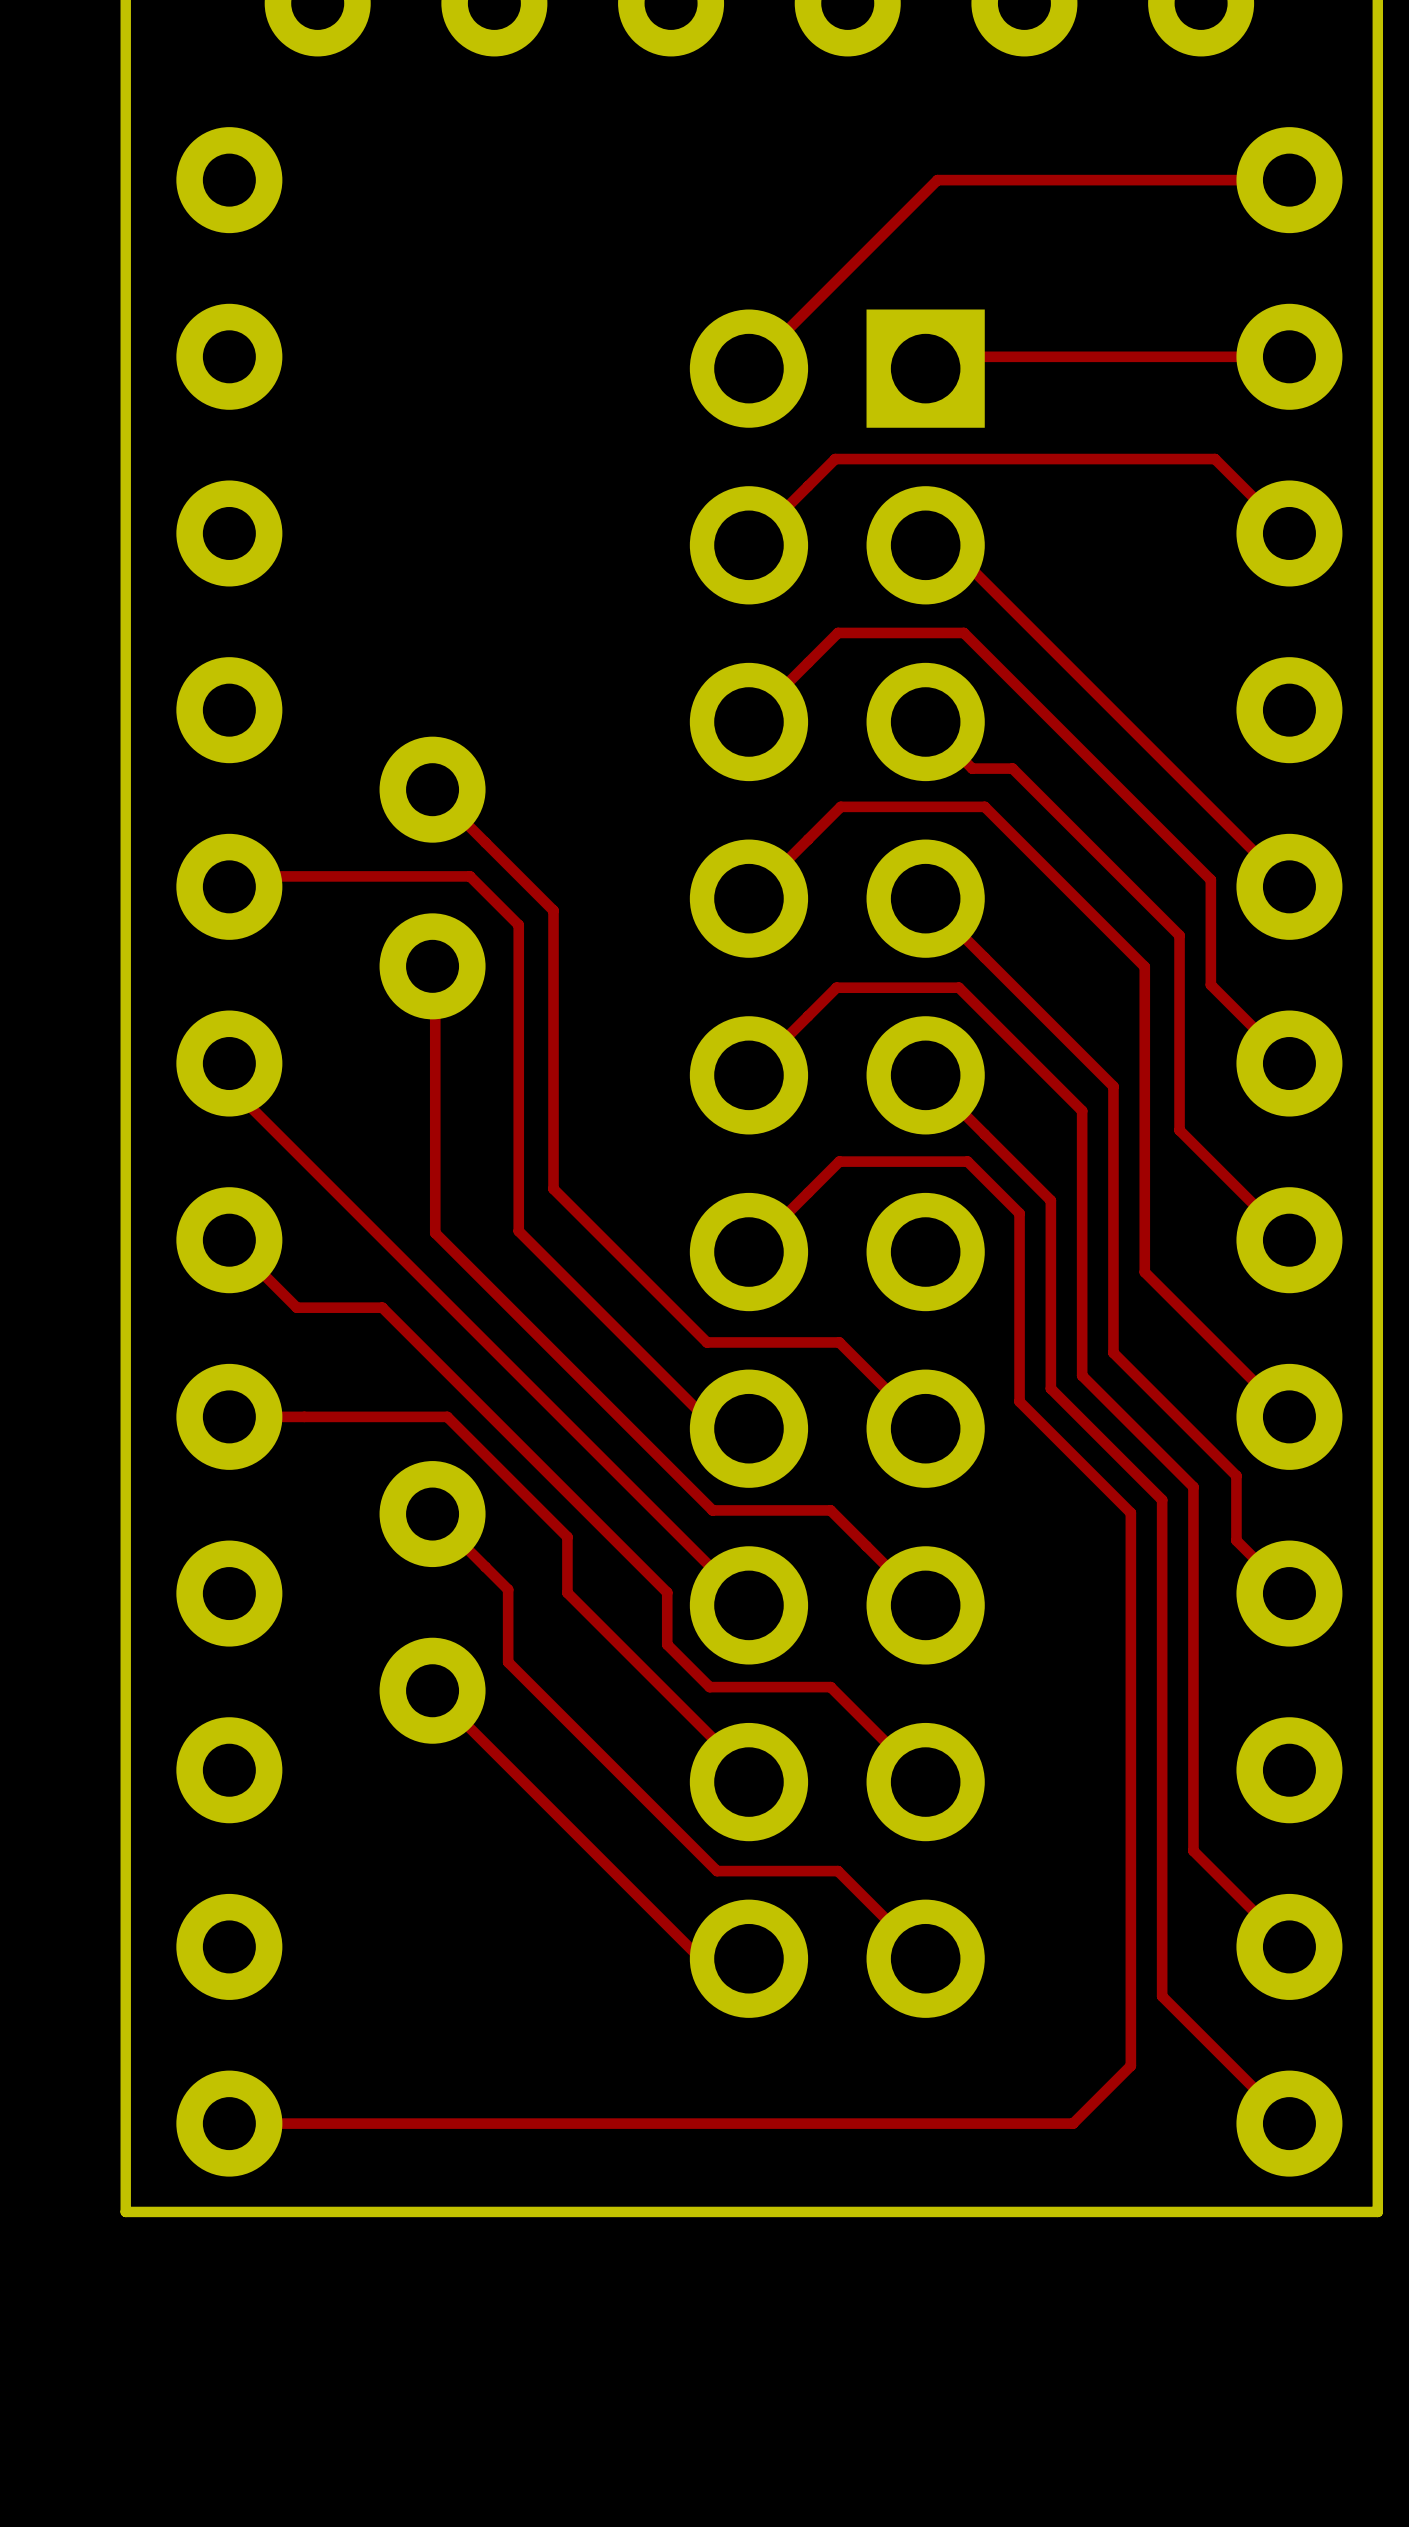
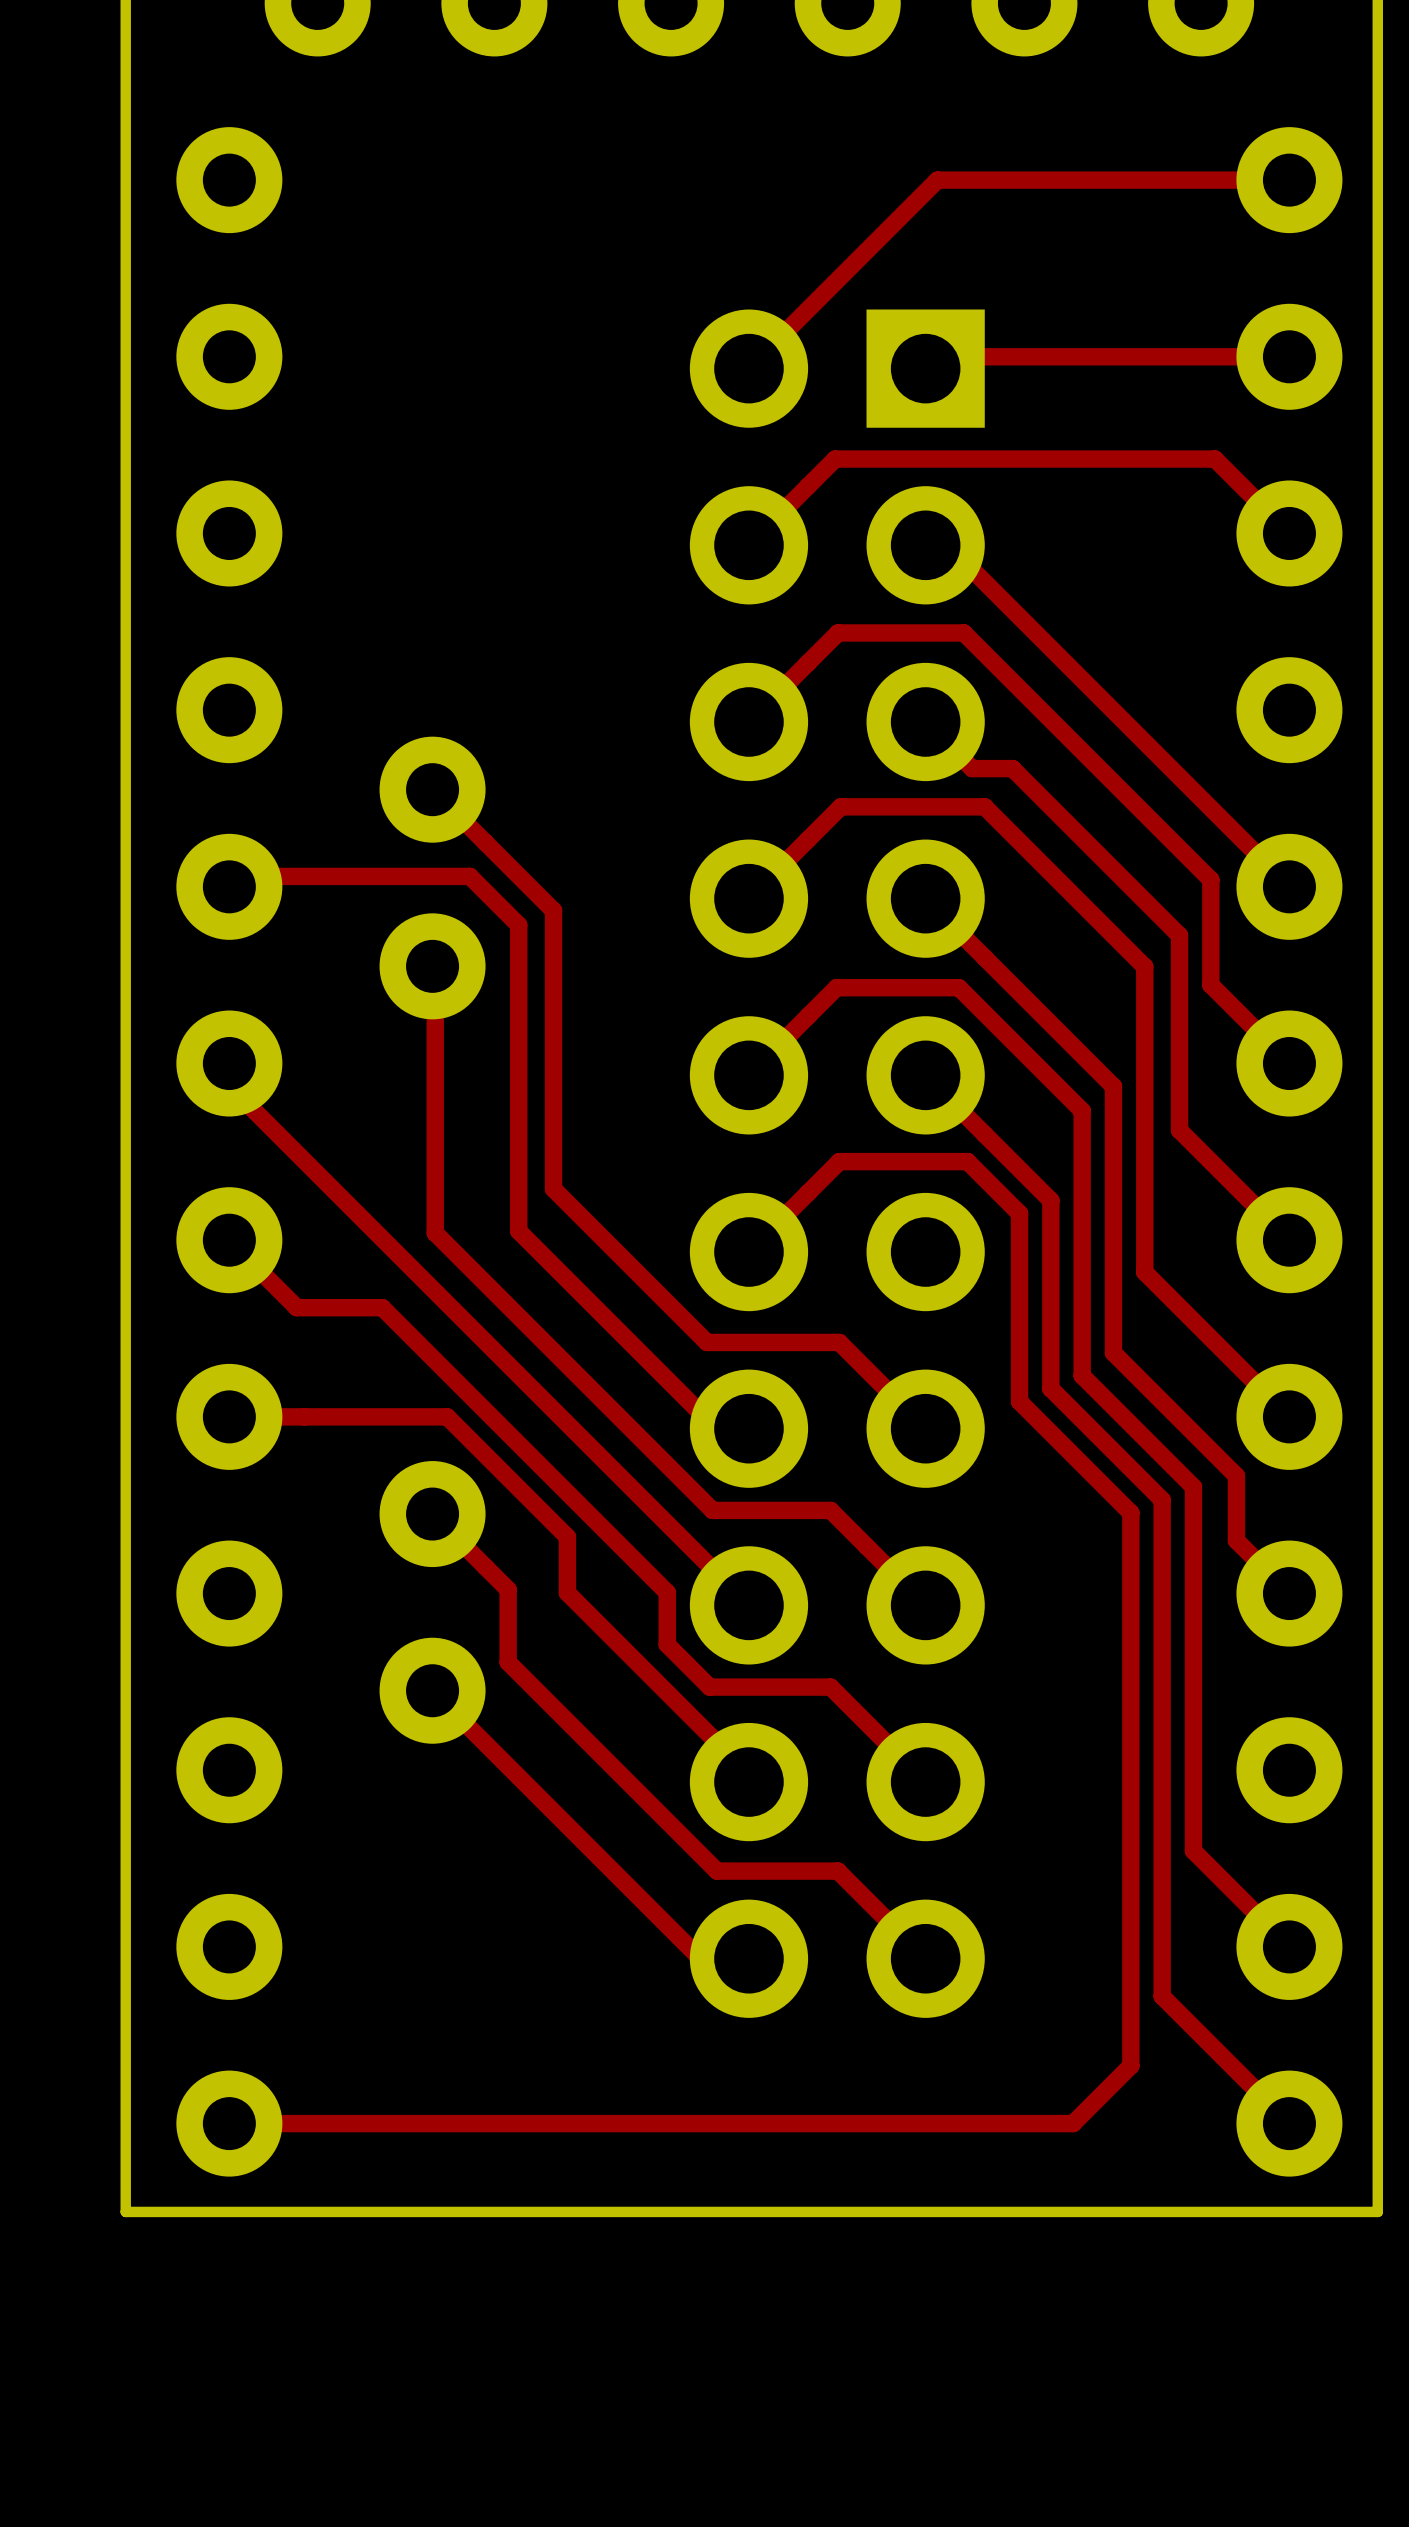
top track width: thin (1289, 180) (937, 180) (748, 368) -> thick (1289, 180) (937, 180) (748, 368)
top track width: thin (1289, 356) (937, 356) (925, 368) -> thick (1289, 356) (937, 356) (925, 368)
top track width: thin (1289, 533) (1215, 459) (835, 459) (748, 545) -> thick (1289, 533) (1215, 459) (835, 459) (748, 545)
top track width: thin (925, 545) (947, 545) (1289, 886) -> thick (925, 545) (947, 545) (1289, 886)
top track width: thin (748, 721) (838, 632) (963, 632) (1210, 879) (1210, 984) (1289, 1063) -> thick (748, 721) (838, 632) (963, 632) (1210, 879) (1210, 984) (1289, 1063)
top track width: thin (925, 721) (972, 768) (1012, 768) (1179, 935) (1179, 1130) (1289, 1240) -> thick (925, 721) (972, 768) (1012, 768) (1179, 935) (1179, 1130) (1289, 1240)
top track width: thin (432, 789) (553, 910) (553, 1188) (706, 1342) (839, 1342) (925, 1428) -> thick (432, 789) (553, 910) (553, 1188) (706, 1342) (839, 1342) (925, 1428)
top track width: thin (229, 886) (239, 876) (470, 876) (518, 925) (518, 1231) (716, 1428) (748, 1428) -> thick (229, 886) (239, 876) (470, 876) (518, 925) (518, 1231) (716, 1428) (748, 1428)
top track width: thin (748, 898) (840, 806) (984, 806) (1144, 966) (1144, 1272) (1289, 1416) -> thick (748, 898) (840, 806) (984, 806) (1144, 966) (1144, 1272) (1289, 1416)
top track width: thin (925, 898) (1113, 1086) (1113, 1352) (1236, 1475) (1236, 1540) (1289, 1593) -> thick (925, 898) (1113, 1086) (1113, 1352) (1236, 1475) (1236, 1540) (1289, 1593)
top track width: thin (432, 966) (435, 969) (435, 1233) (712, 1510) (830, 1510) (925, 1605) -> thick (432, 966) (435, 969) (435, 1233) (712, 1510) (830, 1510) (925, 1605)
top track width: thin (229, 1063) (229, 1085) (748, 1605) -> thick (229, 1063) (229, 1085) (748, 1605)
top track width: thin (748, 1075) (836, 987) (958, 987) (1082, 1110) (1082, 1375) (1193, 1487) (1193, 1850) (1289, 1946) -> thick (748, 1075) (836, 987) (958, 987) (1082, 1110) (1082, 1375) (1193, 1487) (1193, 1850) (1289, 1946)
top track width: thin (925, 1075) (1050, 1200) (1050, 1388) (1162, 1499) (1162, 1996) (1289, 2123) -> thick (925, 1075) (1050, 1200) (1050, 1388) (1162, 1499) (1162, 1996) (1289, 2123)
top track width: thin (229, 1240) (296, 1307) (382, 1307) (667, 1592) (667, 1644) (709, 1687) (830, 1687) (925, 1782) -> thick (229, 1240) (296, 1307) (382, 1307) (667, 1592) (667, 1644) (709, 1687) (830, 1687) (925, 1782)
top track width: thin (748, 1252) (839, 1161) (967, 1161) (1019, 1213) (1019, 1401) (1130, 1512) (1130, 2065) (1073, 2123) (229, 2123) -> thick (748, 1252) (839, 1161) (967, 1161) (1019, 1213) (1019, 1401) (1130, 1512) (1130, 2065) (1073, 2123) (229, 2123)
top track width: thin (229, 1416) (447, 1416) (567, 1537) (567, 1592) (748, 1774) (748, 1782) -> thick (229, 1416) (447, 1416) (567, 1537) (567, 1592) (748, 1774) (748, 1782)
top track width: thin (432, 1514) (508, 1589) (508, 1662) (717, 1871) (838, 1871) (925, 1958) -> thick (432, 1514) (508, 1589) (508, 1662) (717, 1871) (838, 1871) (925, 1958)
top track width: thin (432, 1690) (700, 1958) (748, 1958) -> thick (432, 1690) (700, 1958) (748, 1958)

